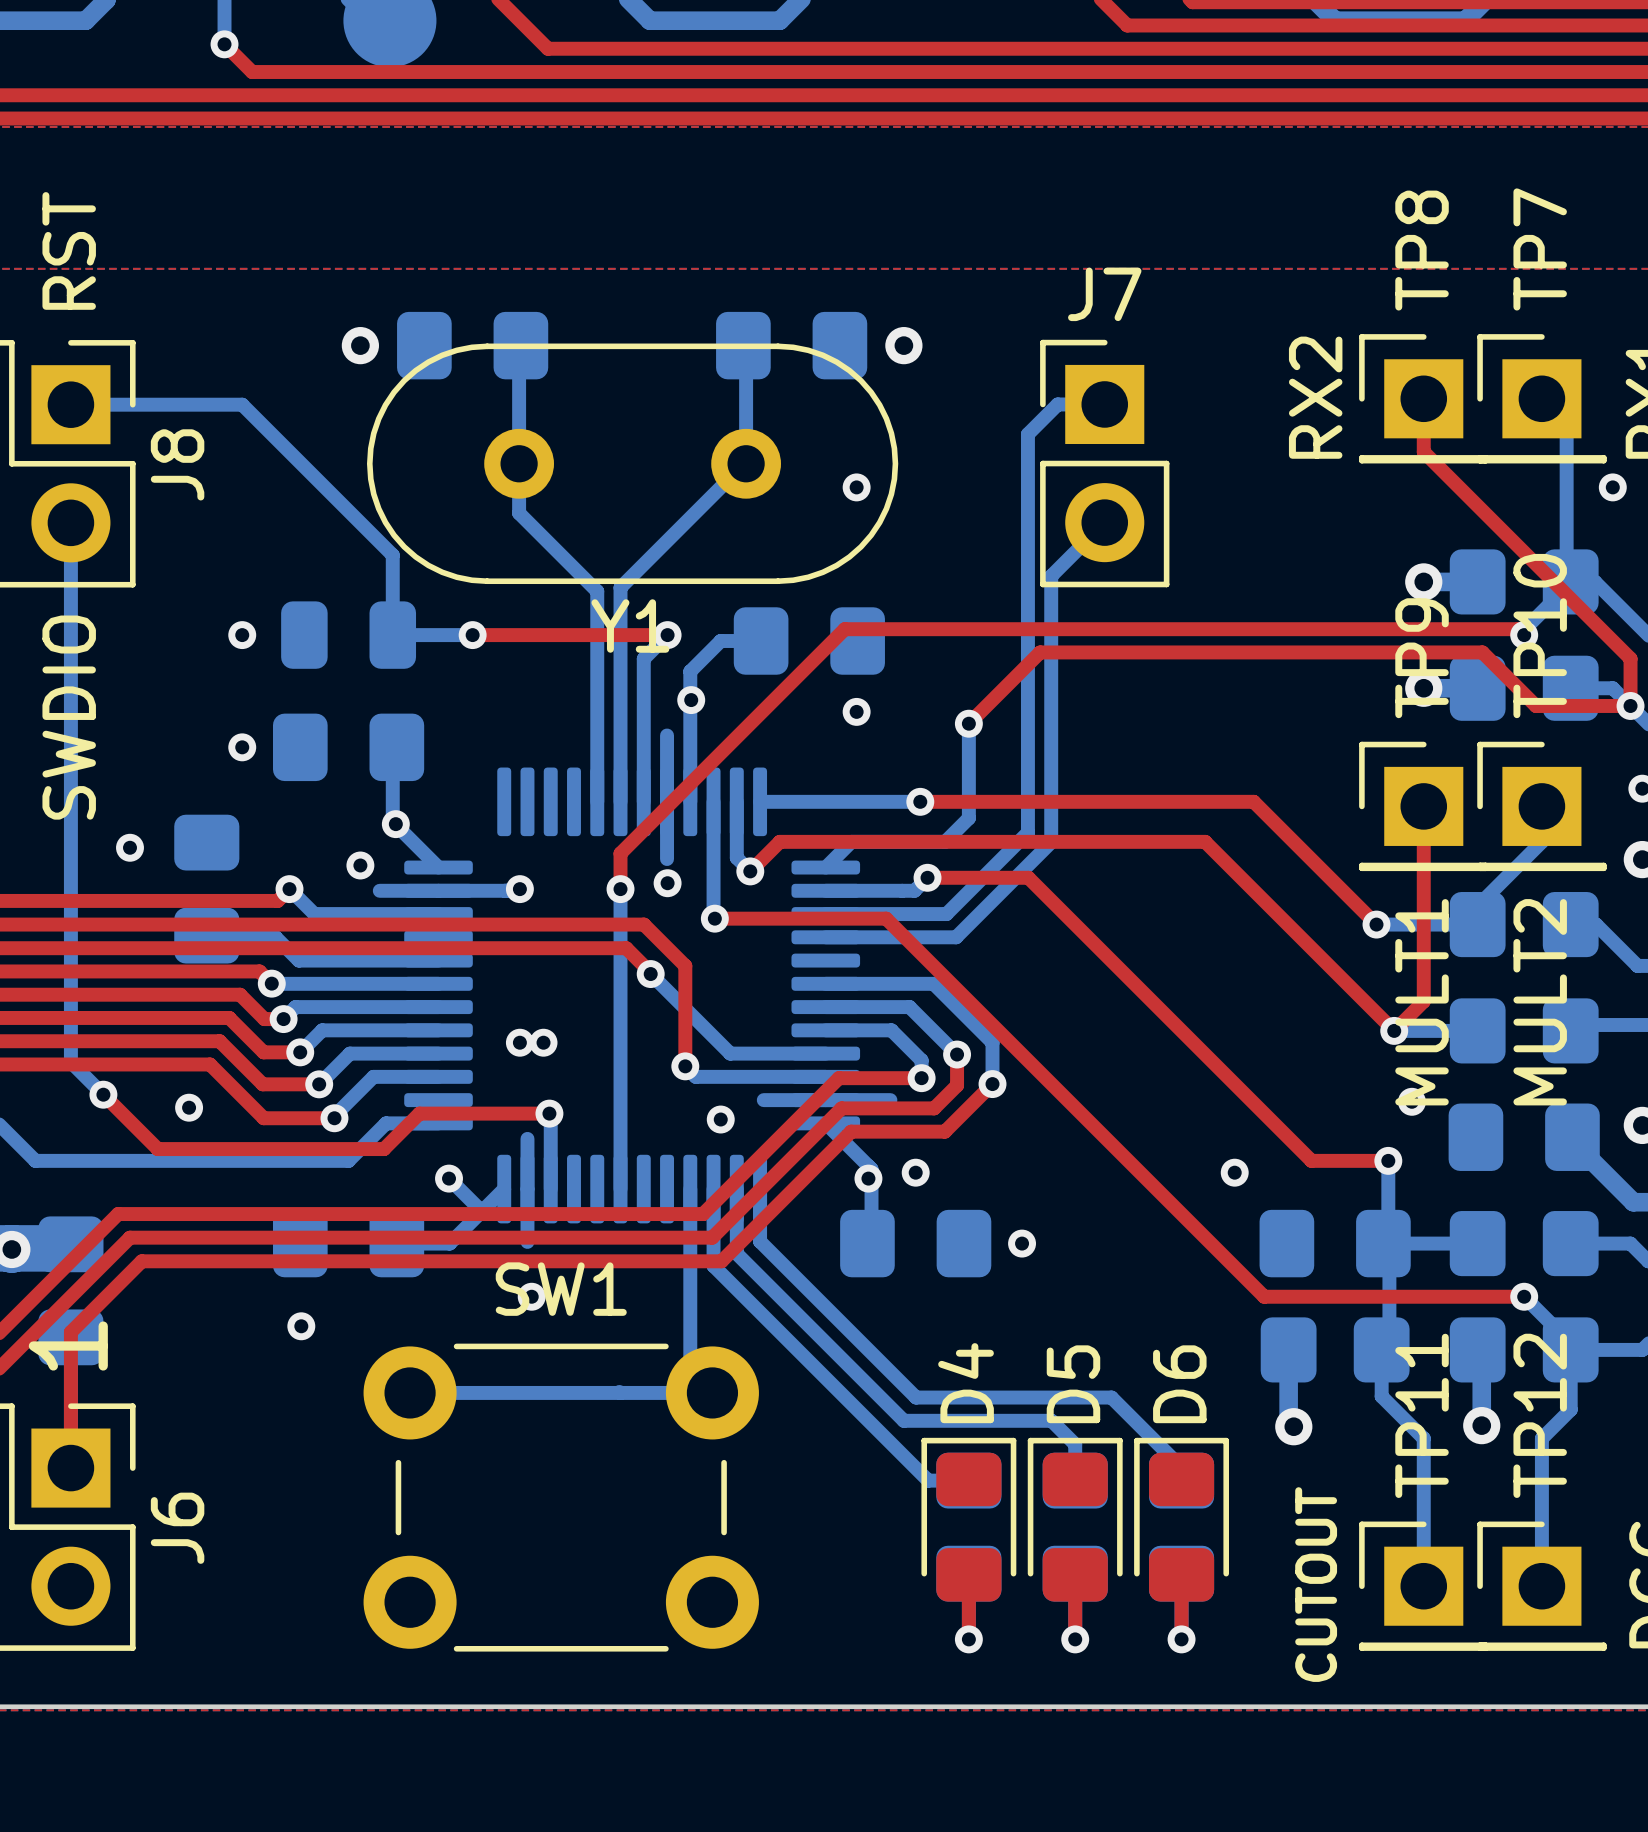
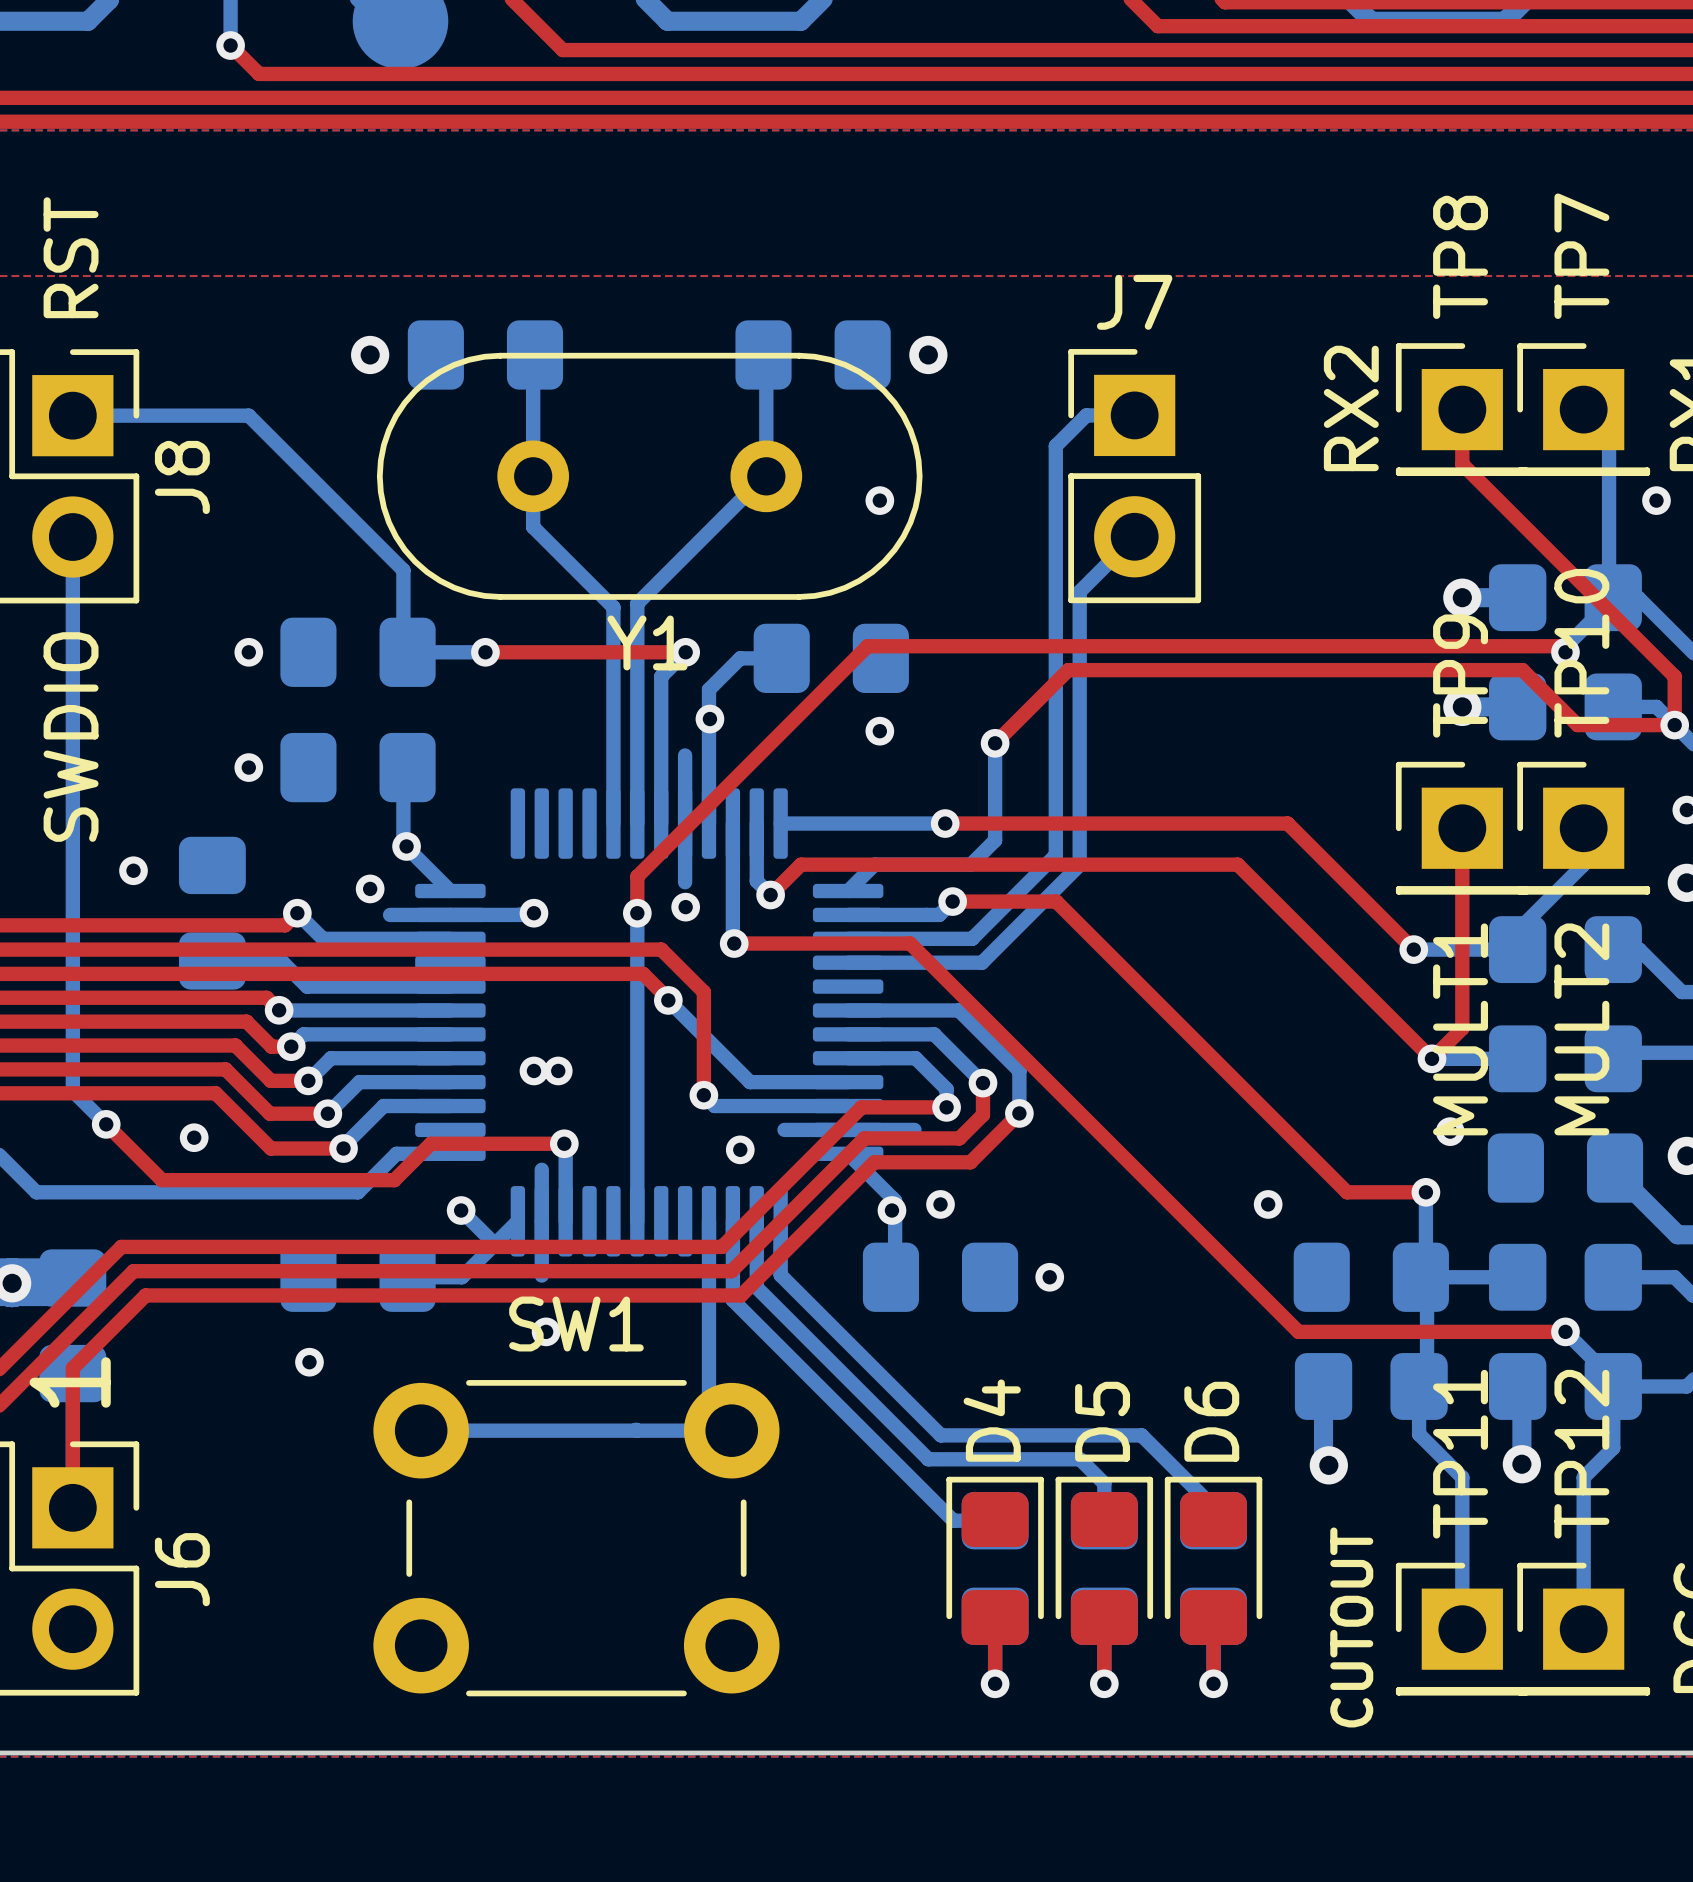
part footprint: [281, 601, 417, 669] -> [280, 617, 436, 687]

